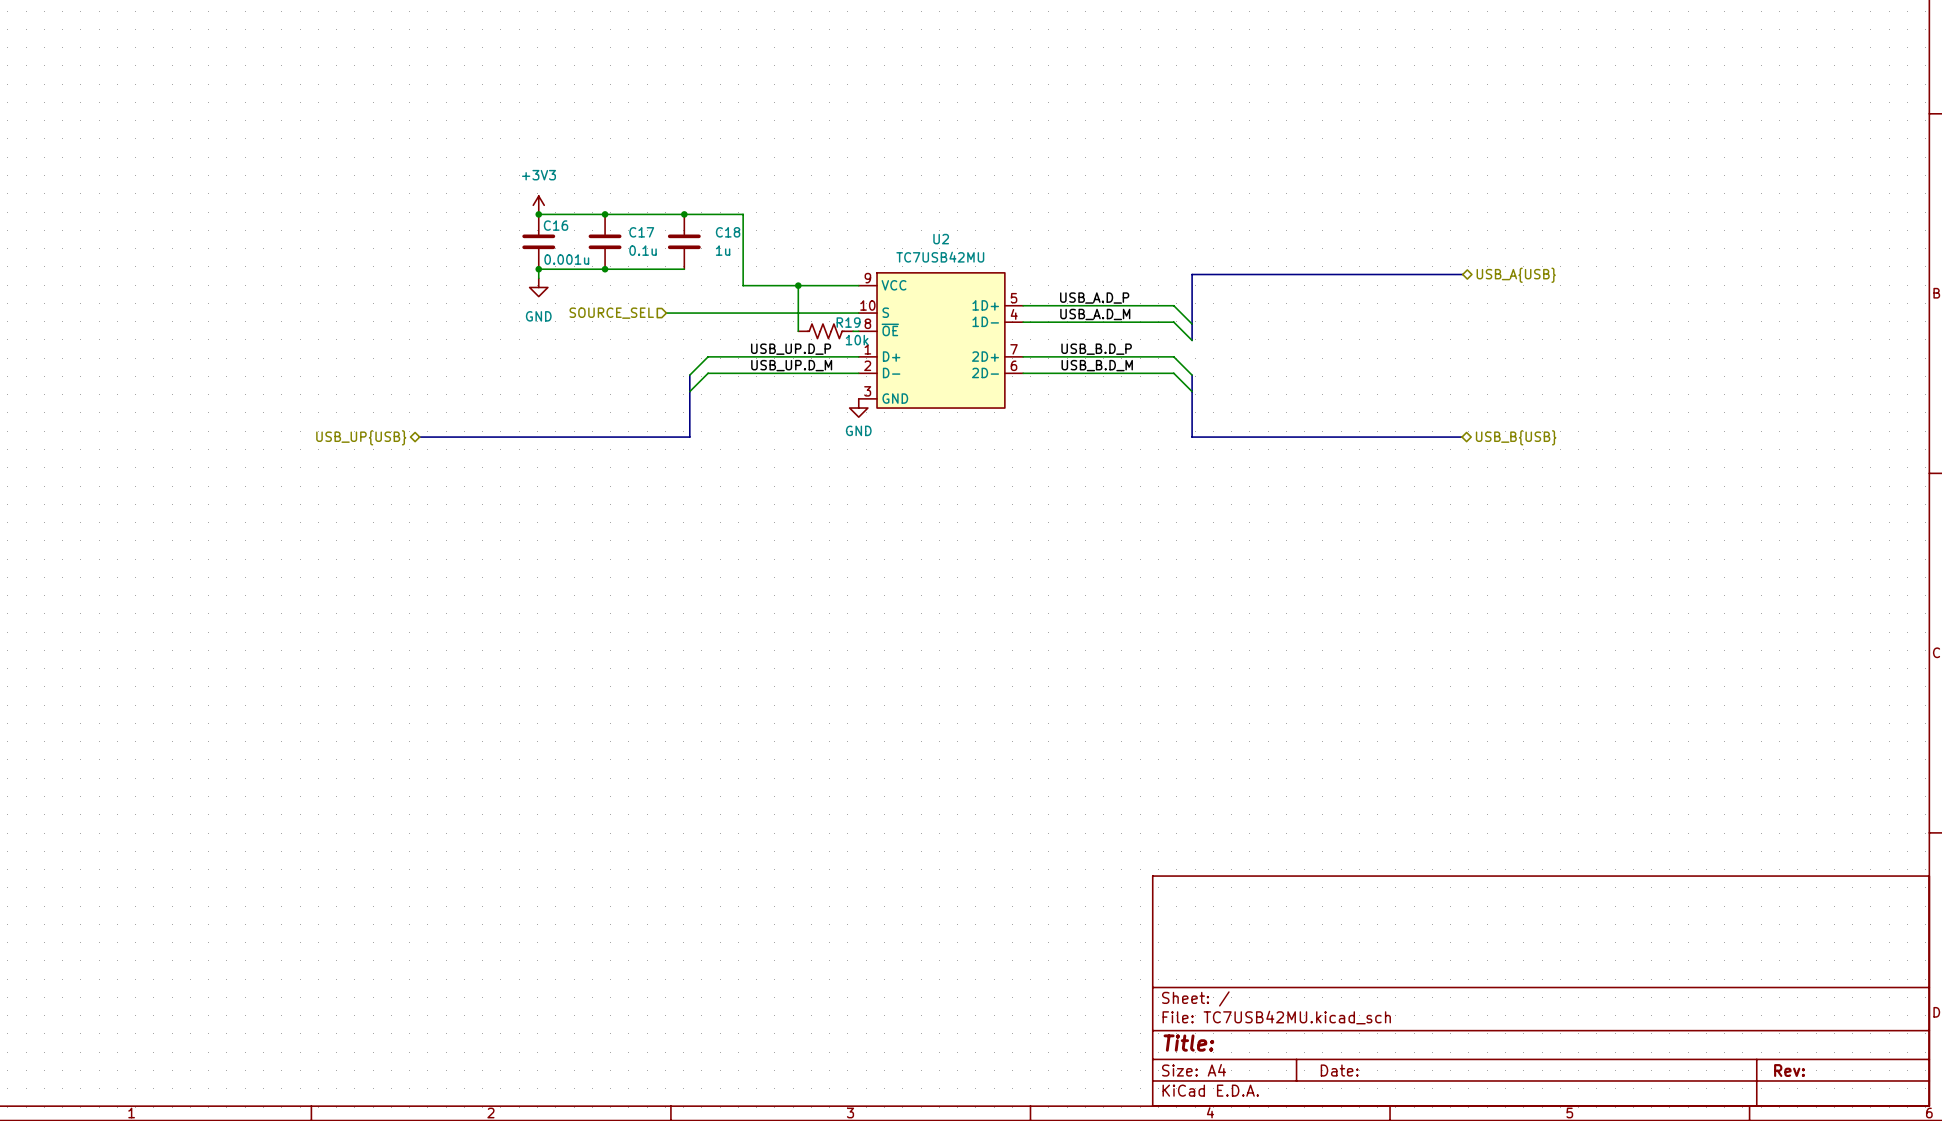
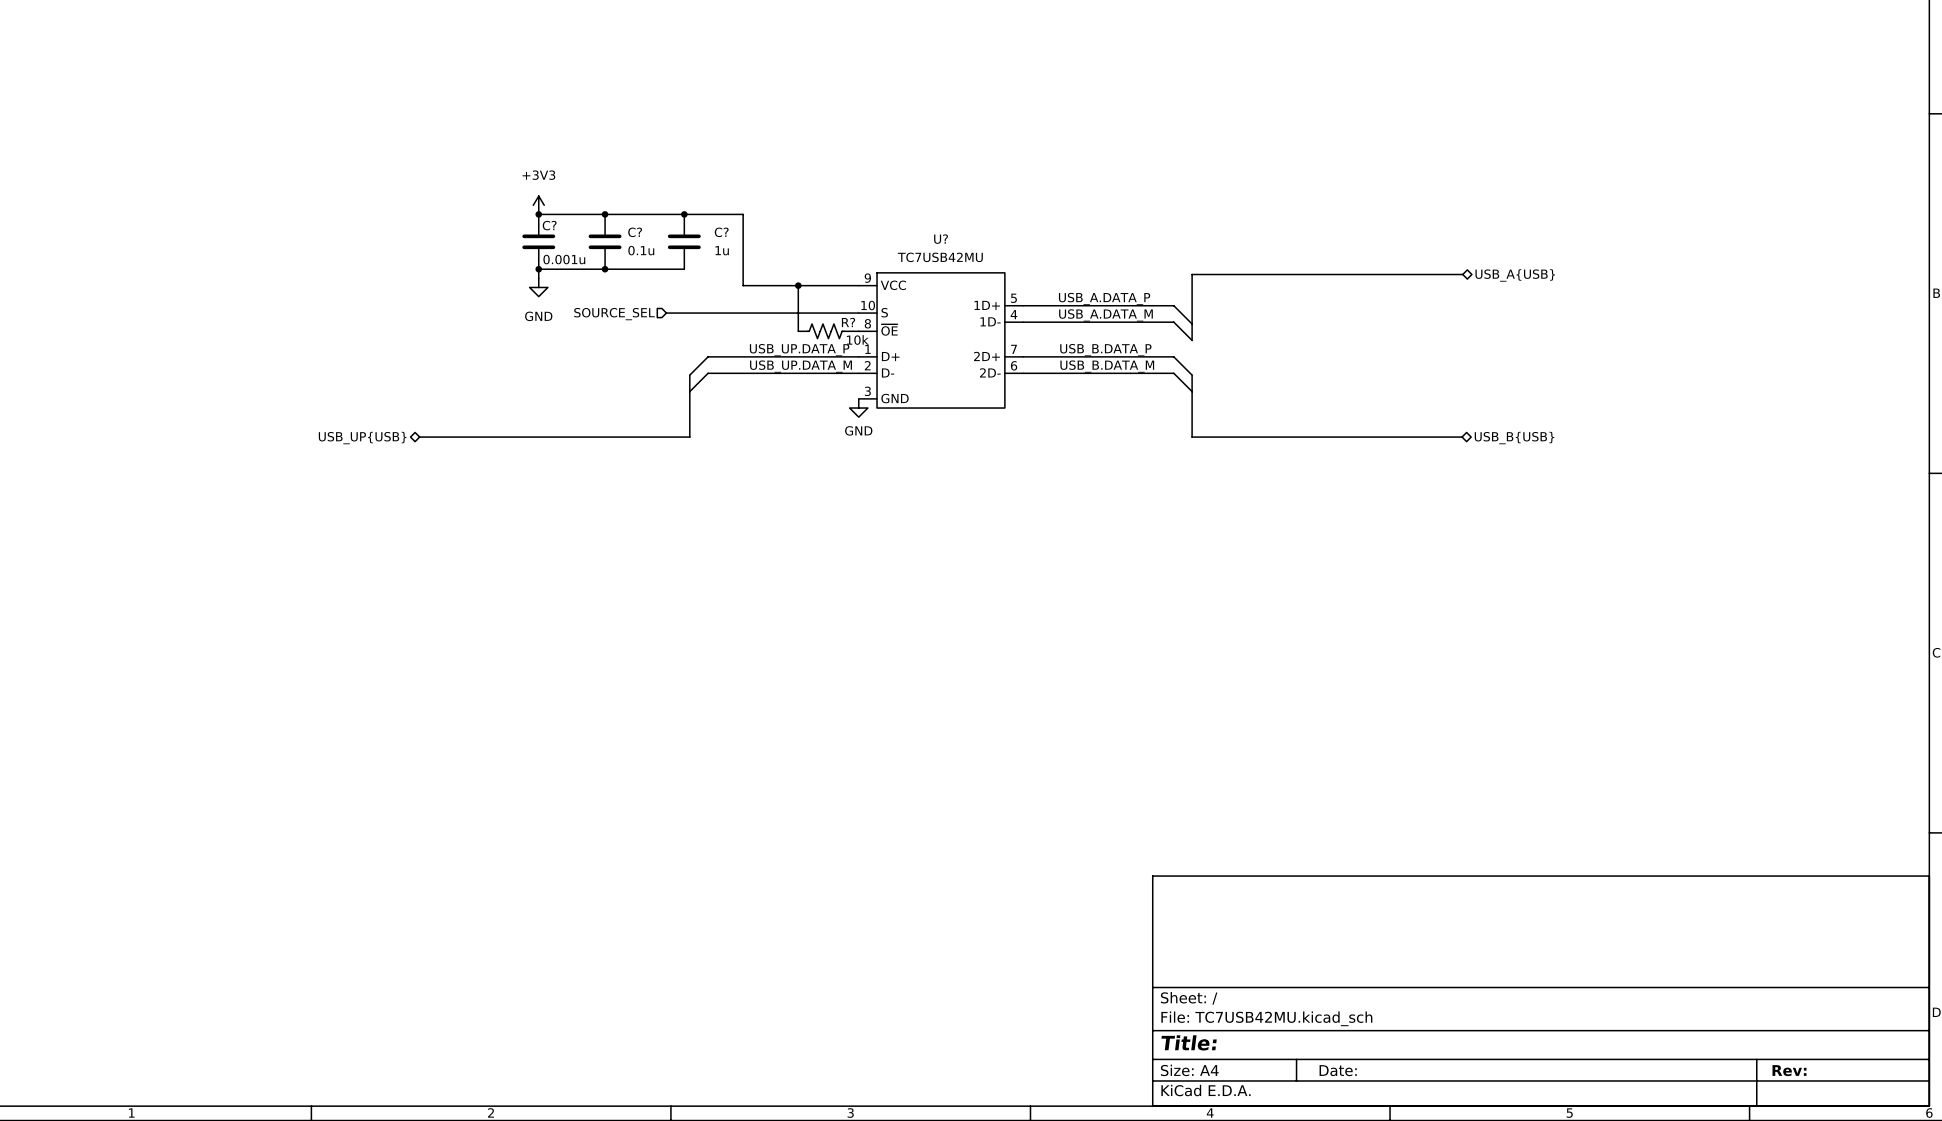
C16 name: C16 (556, 225) -> C? (549, 225)
C17 name: C17 (641, 232) -> C? (635, 232)
C18 name: C18 (728, 232) -> C? (721, 232)
U2 name: U2 (941, 239) -> U? (941, 239)
label: USB_A.D_P (1094, 298) -> USB_A.DATA_P (1104, 298)
label: USB_A.D_M (1095, 314) -> USB_A.DATA_M (1105, 315)
R19 name: R19 (848, 322) -> R? (848, 322)
label: USB_UP.D_P (791, 349) -> USB_UP.DATA_P (799, 350)
label: USB_B.D_P (1096, 349) -> USB_B.DATA_P (1105, 350)
label: USB_UP.D_M (791, 365) -> USB_UP.DATA_M (801, 366)
label: USB_B.D_M (1097, 365) -> USB_B.DATA_M (1107, 366)

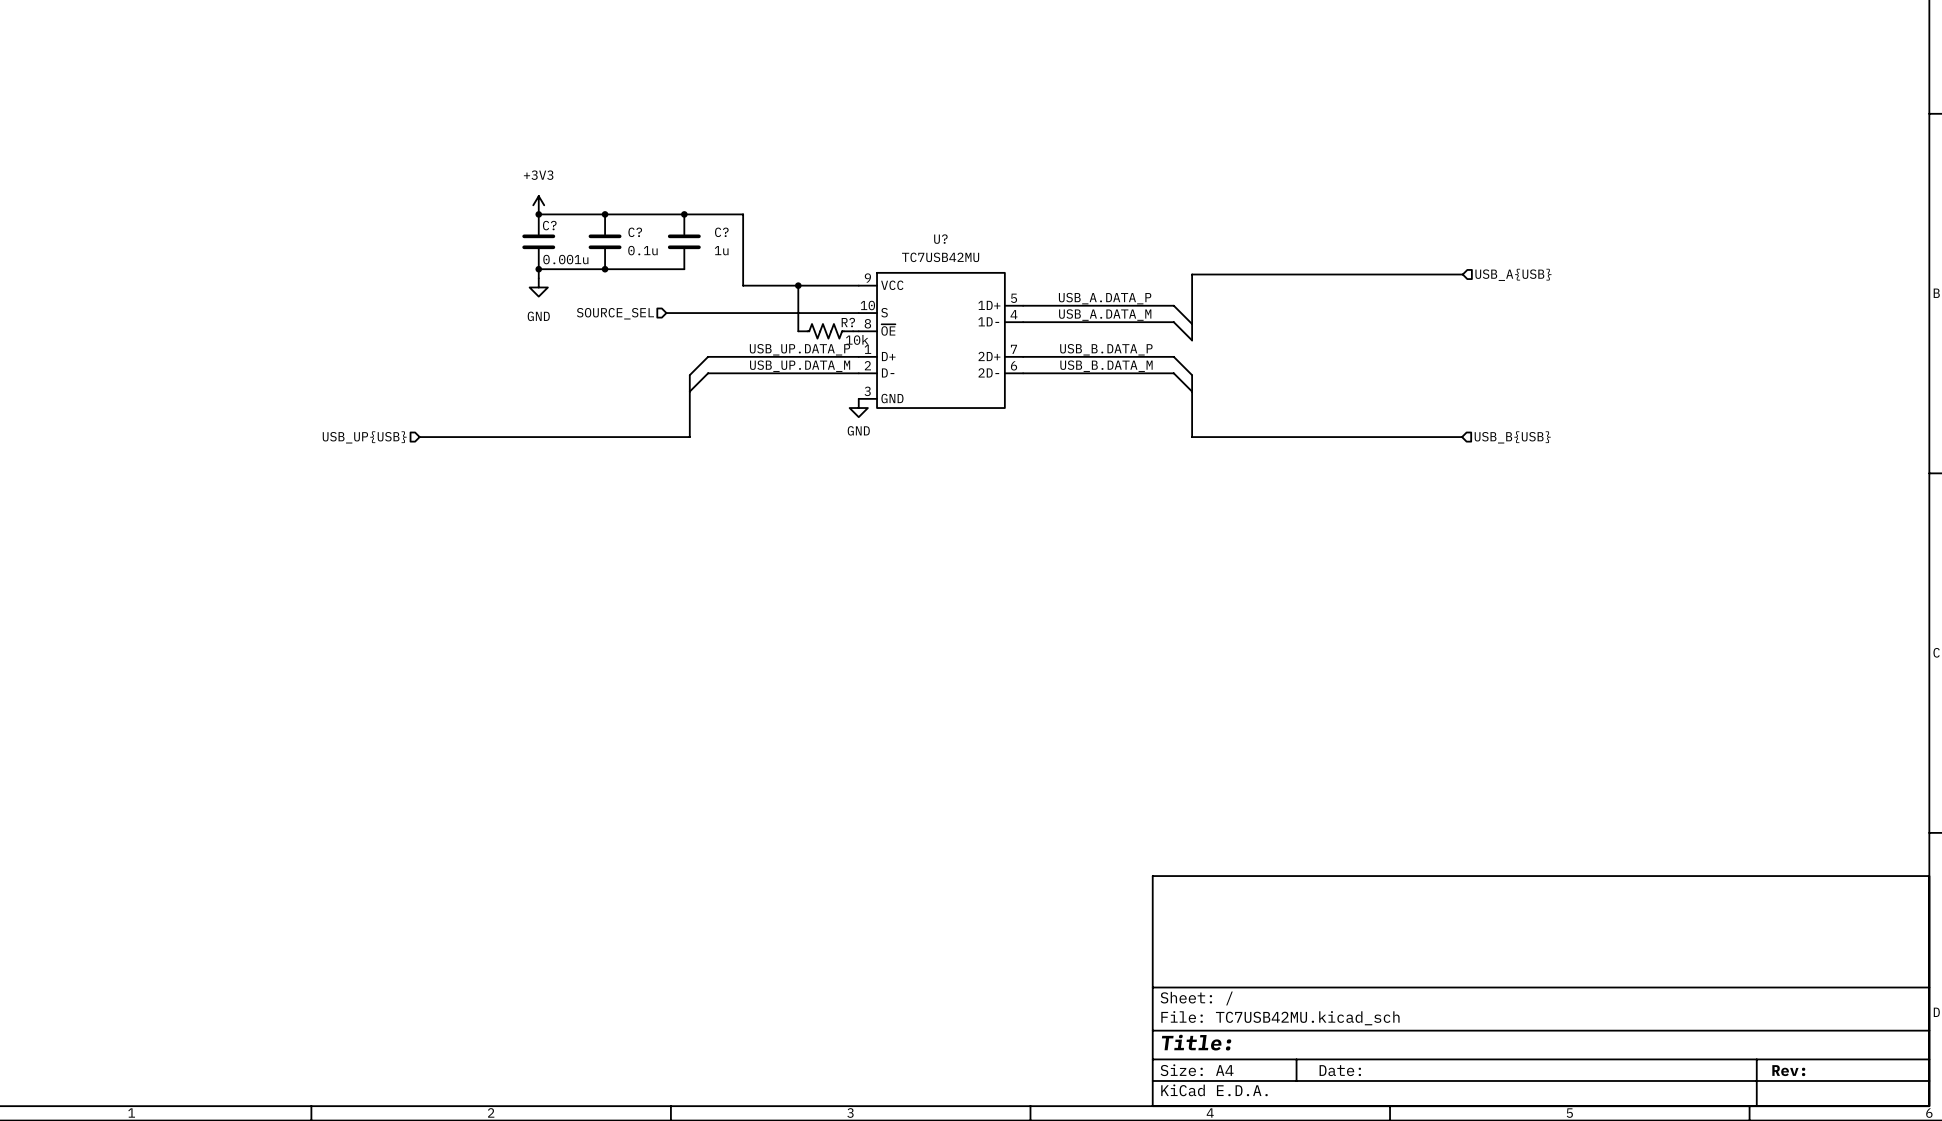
hierarchical label shape: bidirectional (1515, 275) -> input (1513, 274)
hierarchical label shape: bidirectional (362, 438) -> input (364, 437)
hierarchical label shape: bidirectional (1514, 438) -> input (1512, 437)

